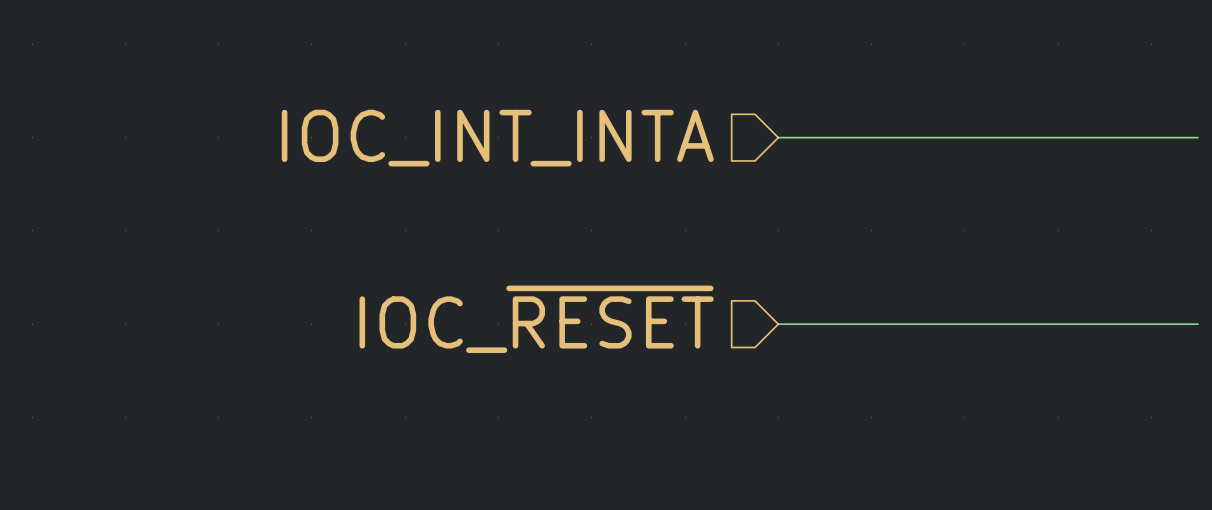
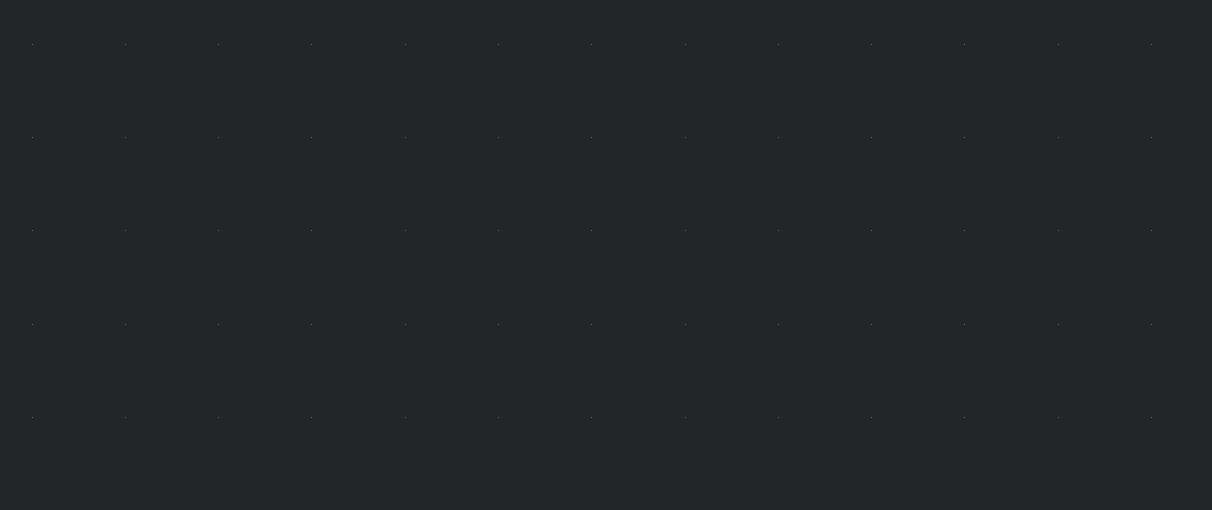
wire: (778, 137) (1198, 137) -> none
hierarchical label: IOC_INT_INTA (497, 138) -> none
hierarchical label: IOC_~{RESET} (536, 319) -> none
wire: (778, 324) (1198, 324) -> none

